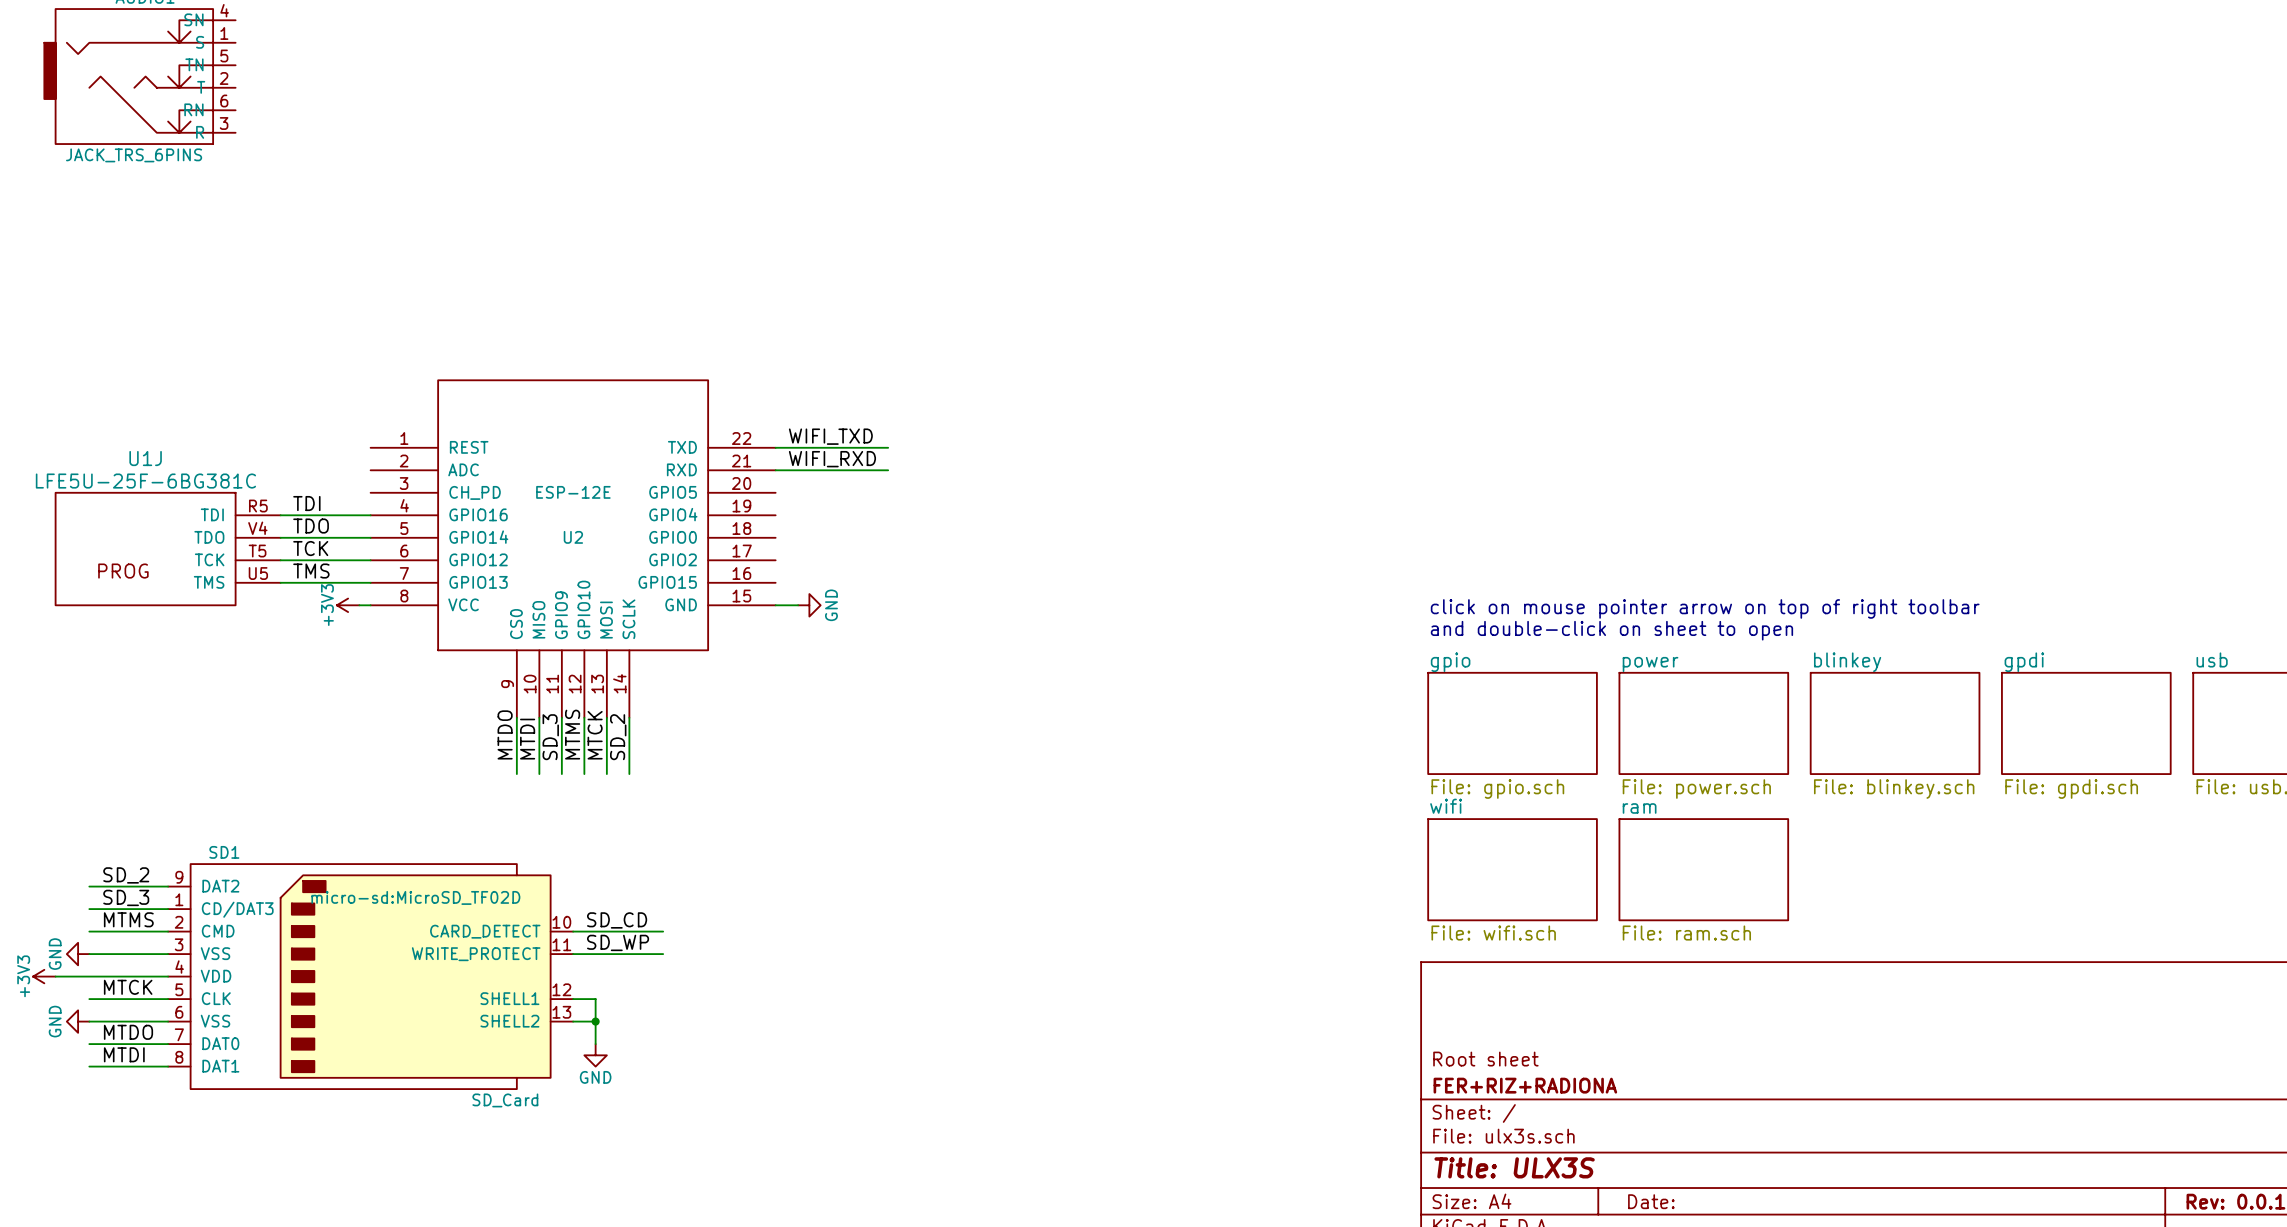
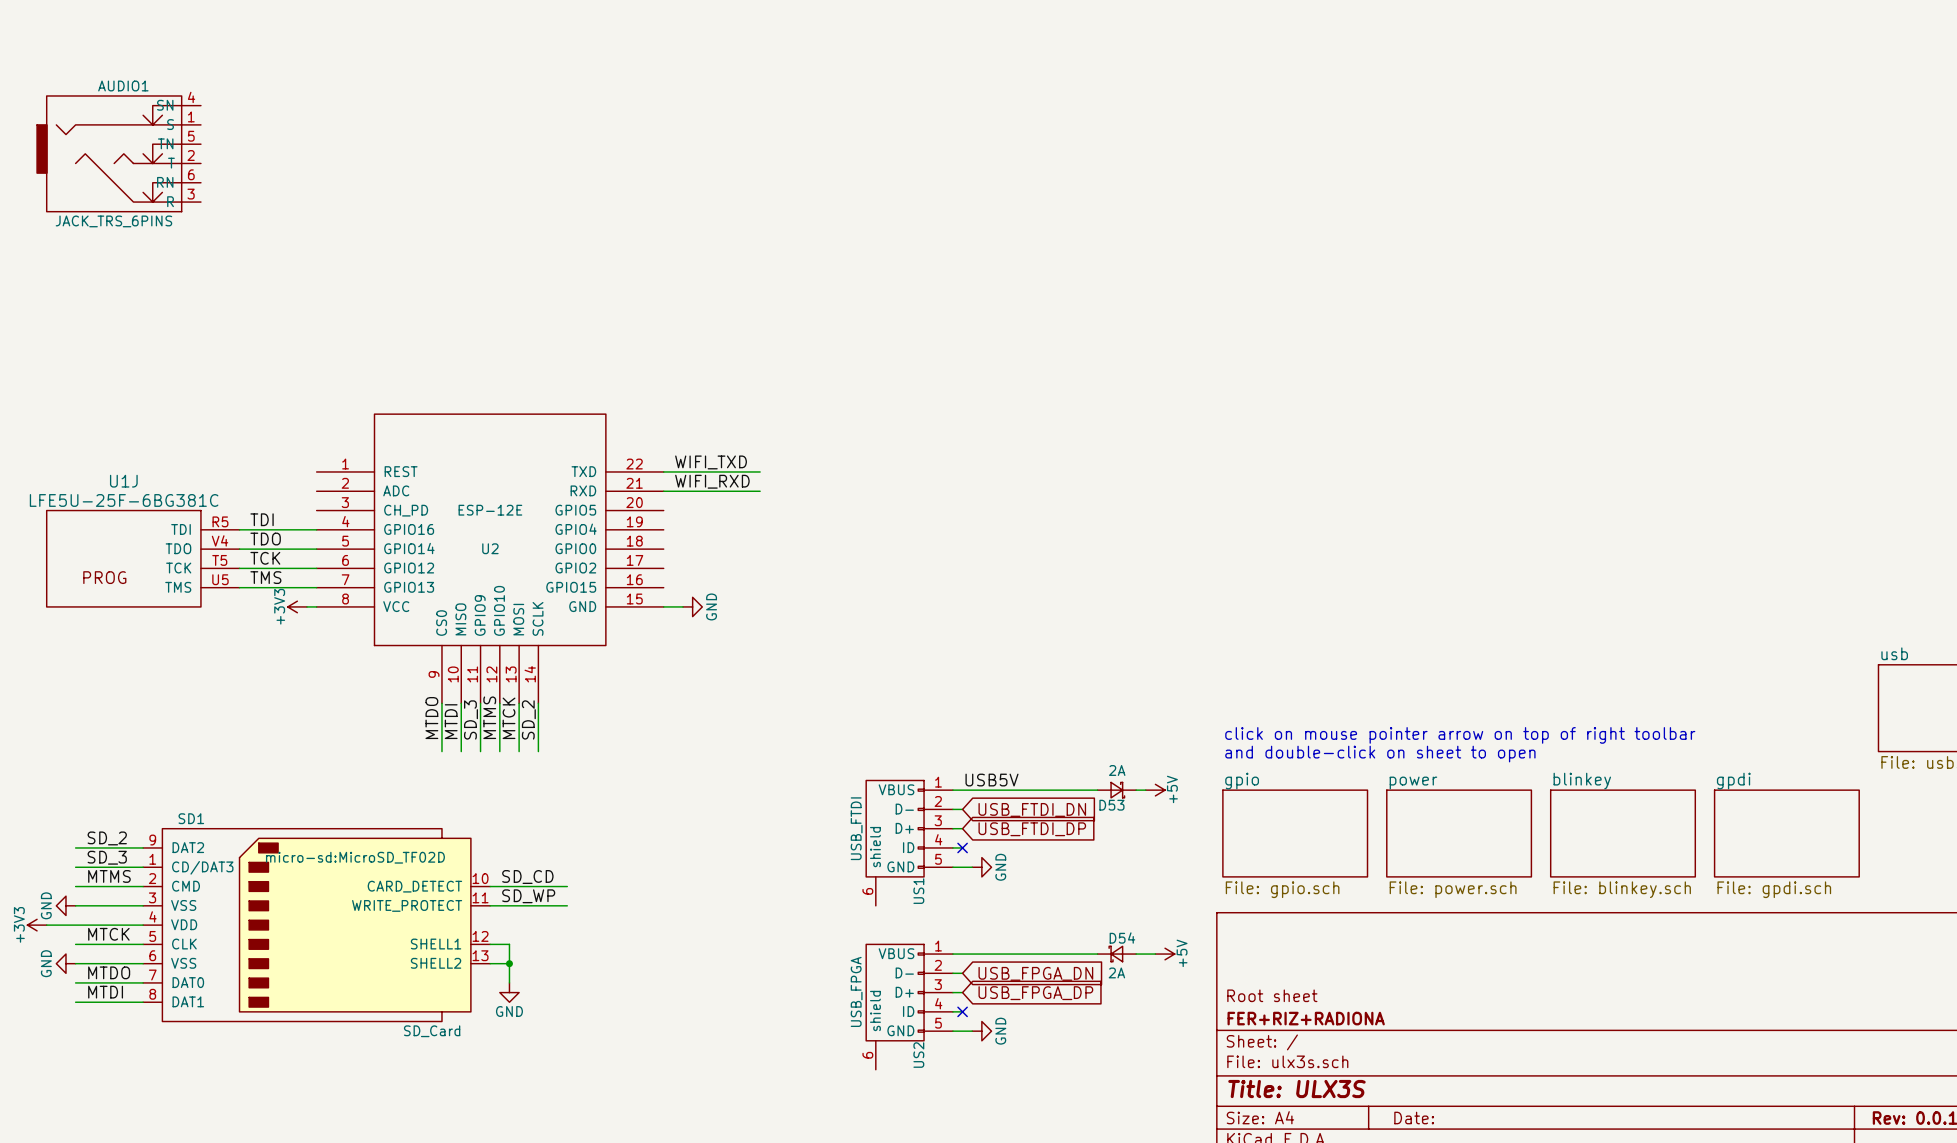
text position: click on mouse pointer arrow on top of right toolbar (1705, 608) -> click on mouse pointer arrow on top of right toolbar (1460, 735)
text position: and double-click on sheet to open (1611, 630) -> and double-click on sheet to open (1380, 754)
sheet gpio: File: gpio.sch (1512, 723) -> none
sheet power: File: power.sch (1703, 723) -> none
sheet blinkey position: (1895, 723) -> (1622, 833)
sheet gpdi position: (2086, 723) -> (1786, 833)
sheet wifi name: wifi (1446, 806) -> gpio (1242, 781)
label: none -> USB5V (992, 780)
sheet ram name: ram (1639, 808) -> power (1413, 782)
wire: none -> (952, 790) (1097, 790)
D53: none -> 2A (1116, 790)
wire: none -> (1136, 790) (1145, 790)
power symbol: none -> +5V (1155, 790)
wire: none -> (952, 809) (962, 809)
global label: none -> USB_FTDI_DN (1032, 809)
wire: none -> (952, 828) (962, 828)
global label: none -> USB_FTDI_DP (1032, 829)
US1: none -> USB_FTDI (909, 843)
wire: none -> (952, 847) (962, 847)
no-connect mark: none -> (962, 847)
wire: none -> (952, 867) (972, 867)
power symbol: none -> GND (981, 867)
sheet wifi value: File: wifi.sch (1493, 933) -> File: gpio.sch (1282, 889)
sheet ram value: File: ram.sch (1686, 933) -> File: power.sch (1453, 889)
wire: none -> (952, 954) (1097, 954)
D54: none -> 2A (1116, 954)
wire: none -> (1136, 954) (1155, 954)
power symbol: none -> +5V (1165, 954)
wire: none -> (952, 973) (962, 973)
global label: none -> USB_FPGA_DN (1035, 973)
wire: none -> (952, 992) (962, 992)
global label: none -> USB_FPGA_DP (1035, 993)
US2: none -> USB_FPGA (909, 1007)
wire: none -> (952, 1011) (962, 1011)
no-connect mark: none -> (962, 1011)
wire: none -> (952, 1031) (972, 1031)
power symbol: none -> GND (981, 1031)

